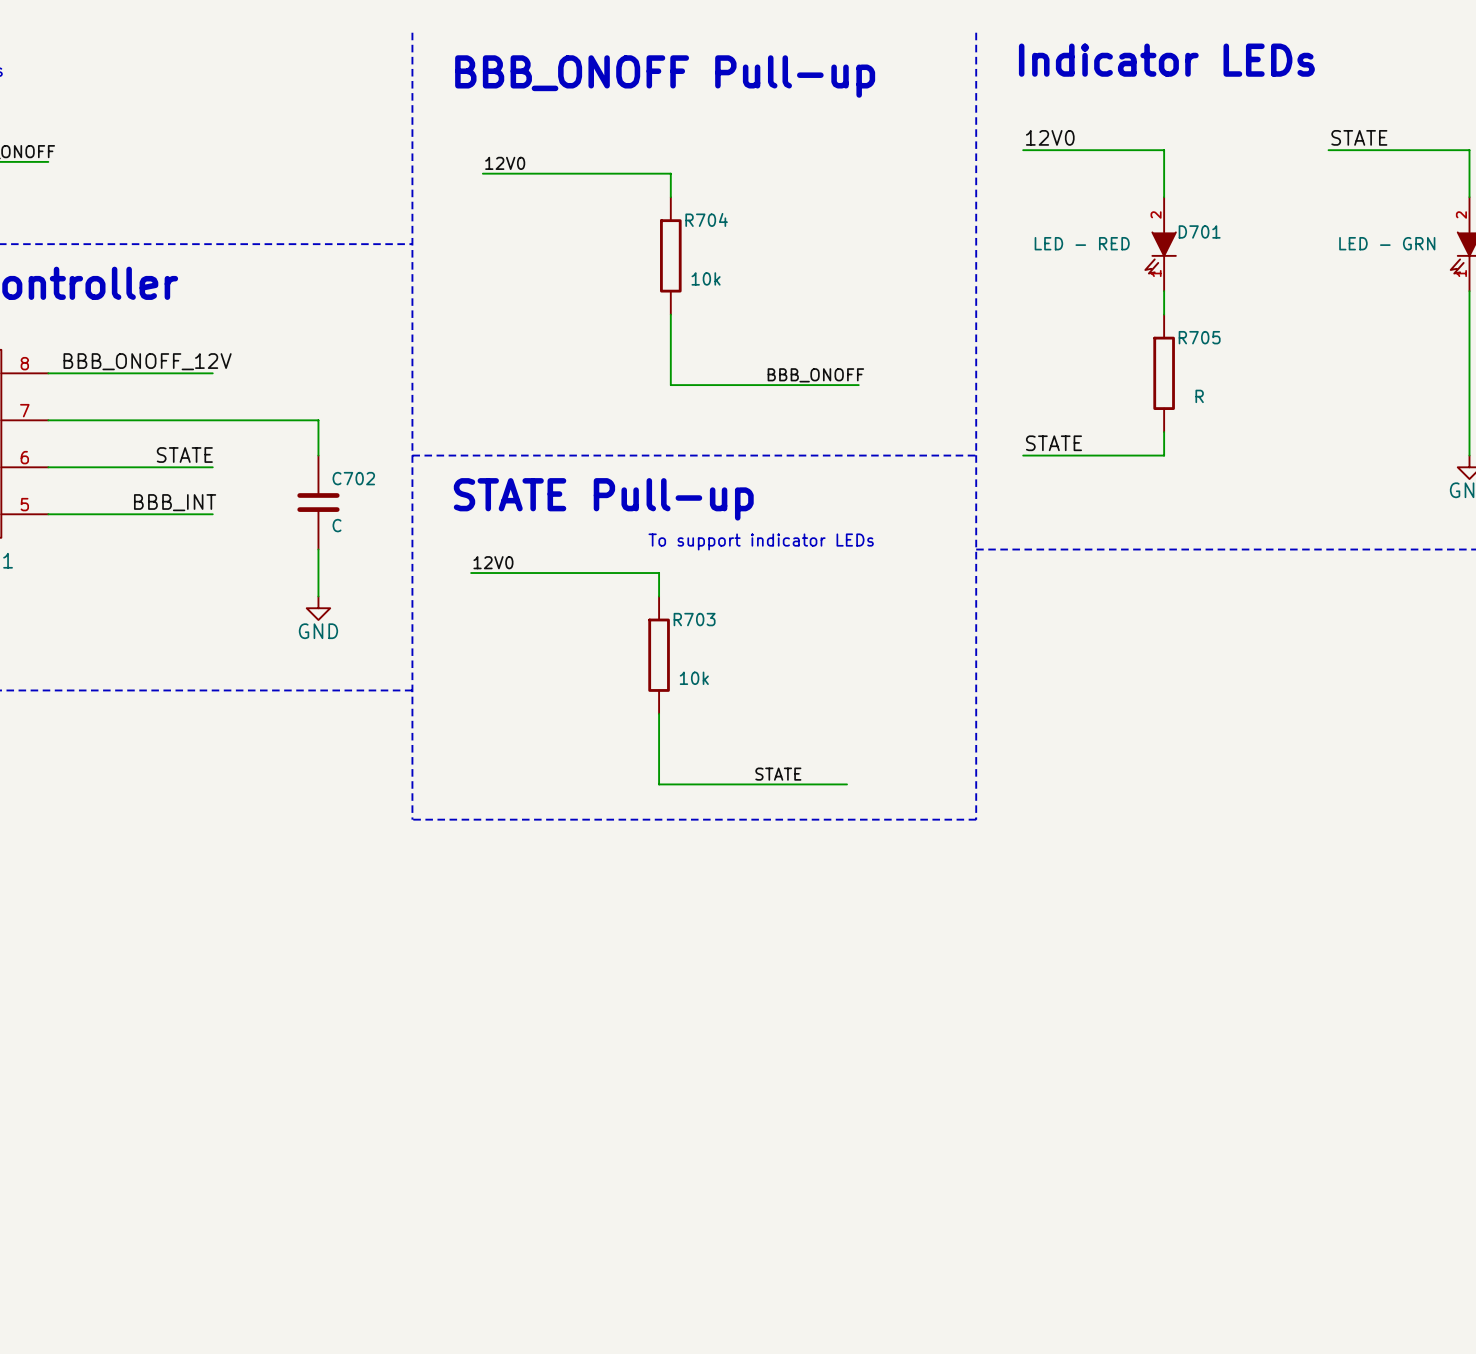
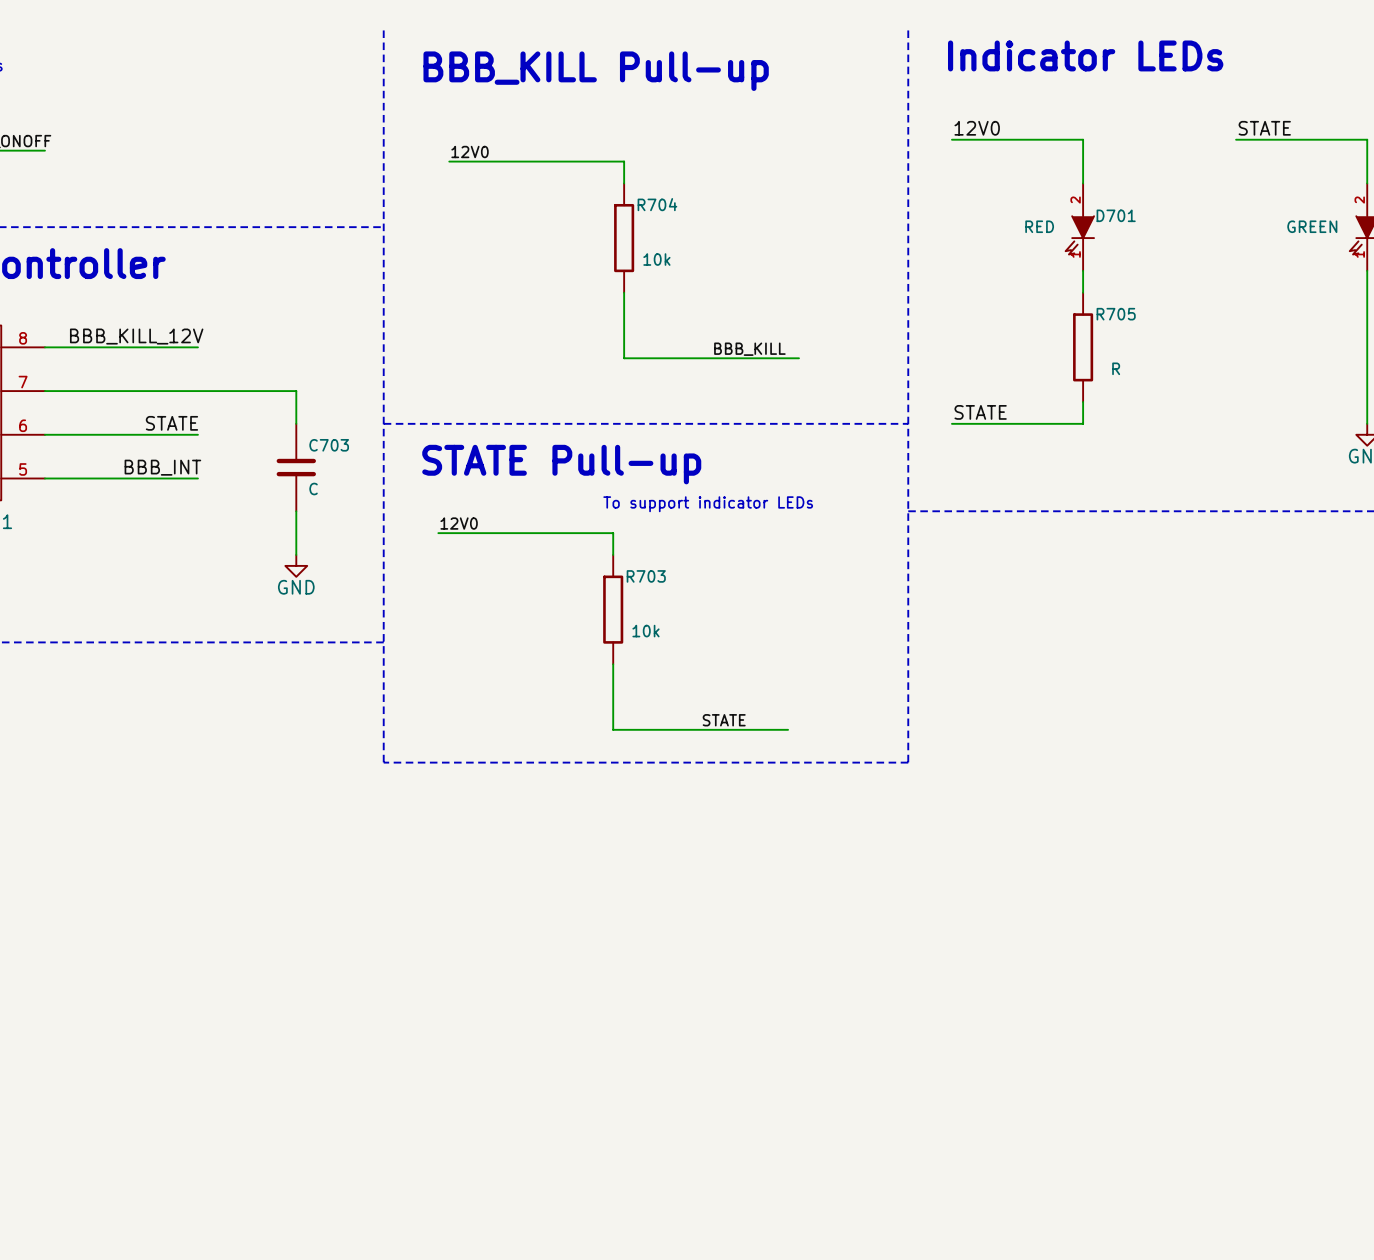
text: BBB_ONOFF Pull-up (665, 76) -> BBB_KILL Pull-up (596, 71)
D701 value: LED - RED (1082, 243) -> RED (1039, 226)
part value: LED - GRN (1387, 243) -> GREEN (1312, 226)
label: BBB_ONOFF_12V (147, 361) -> BBB_KILL_12V (136, 336)
label: BBB_ONOFF (815, 375) -> BBB_KILL (749, 349)
C702 name: C702 (353, 478) -> C703 (329, 445)

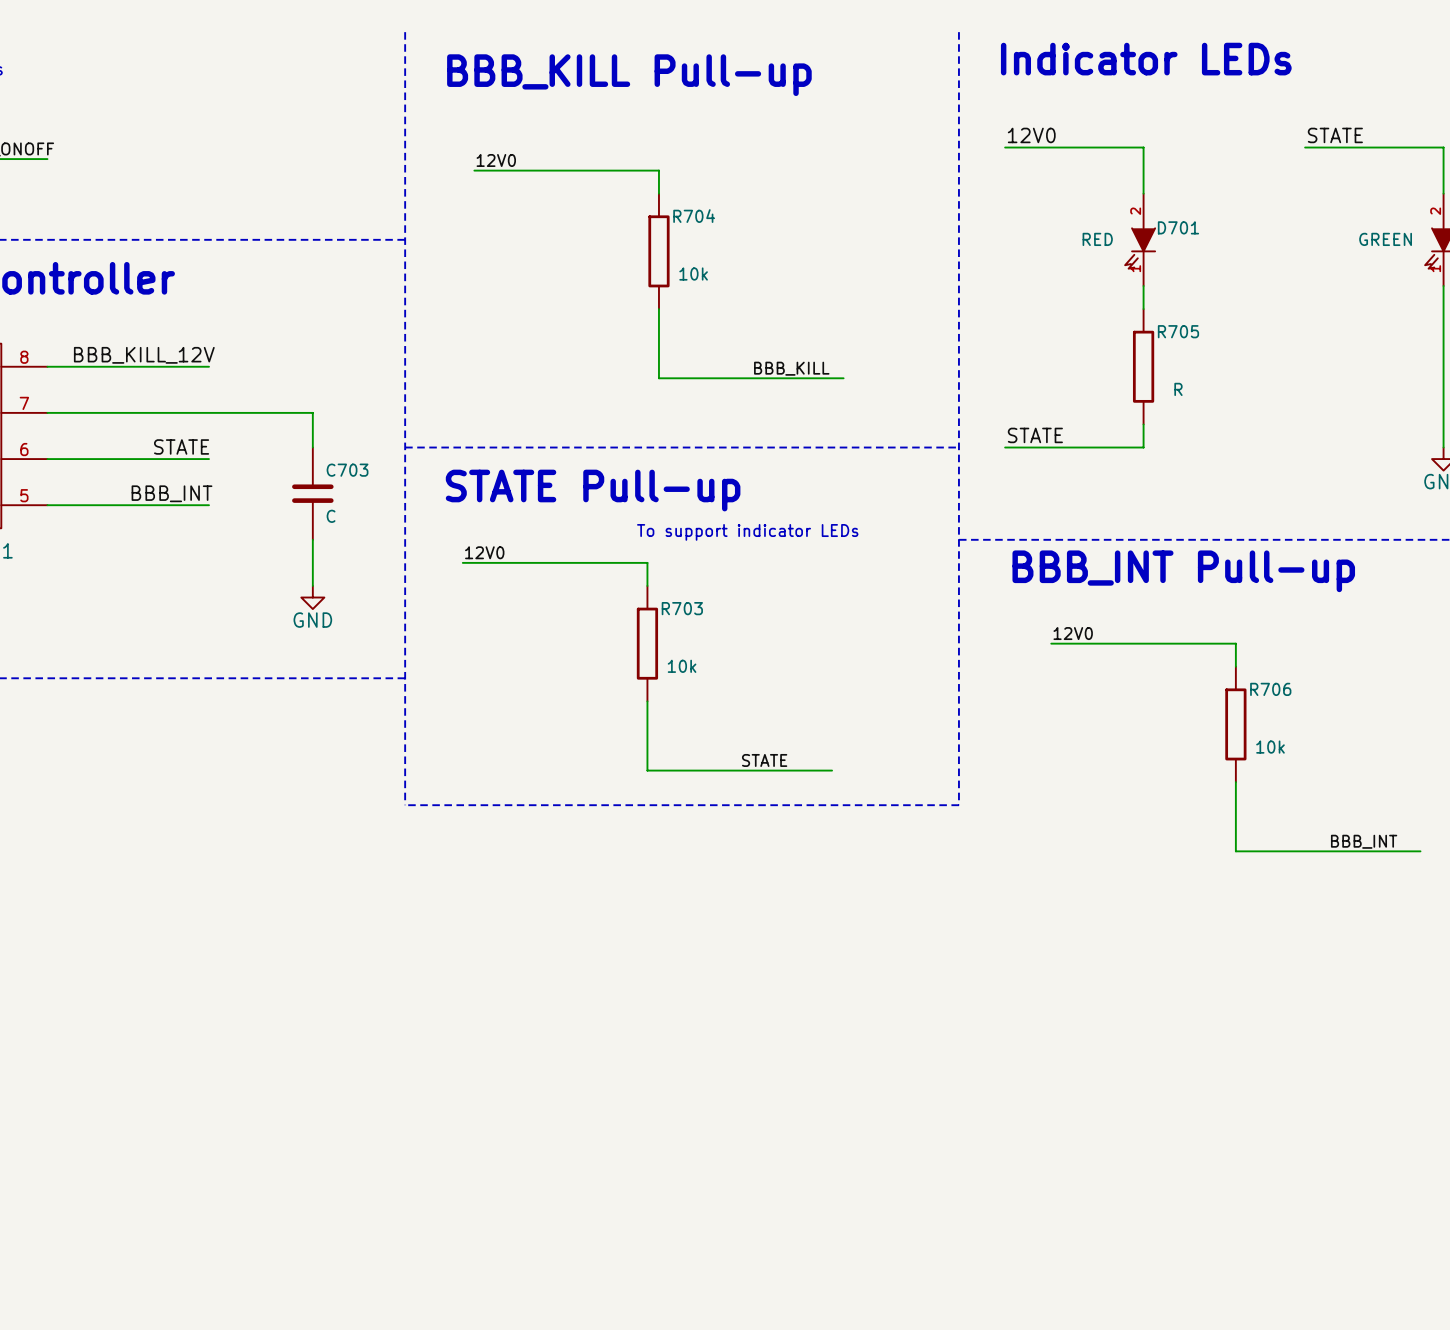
text: none -> BBB_INT Pull-up (1183, 571)
label: none -> 12V0 (1073, 633)
wire: none -> (1051, 643) (1235, 643) (1235, 666)
R706: none -> 10k (1235, 724)
wire: none -> (1235, 782) (1235, 851) (1420, 851)
label: none -> BBB_INT (1364, 841)

